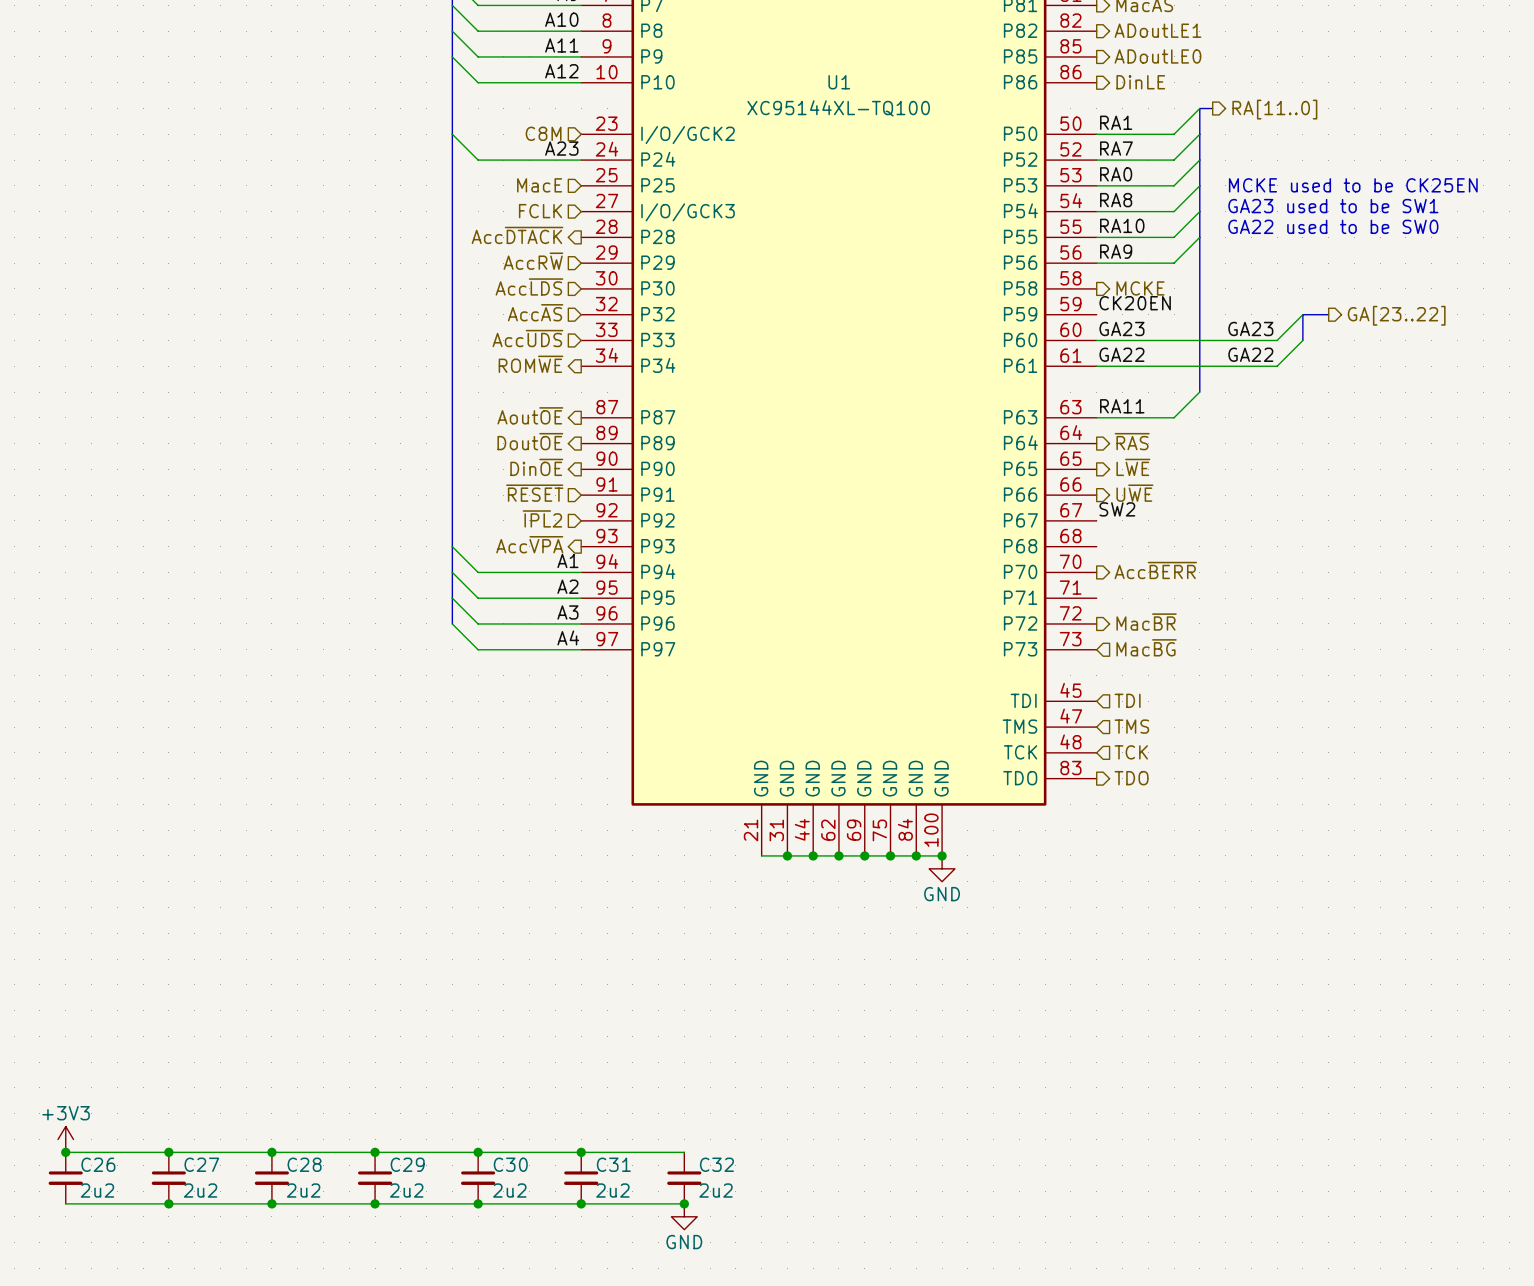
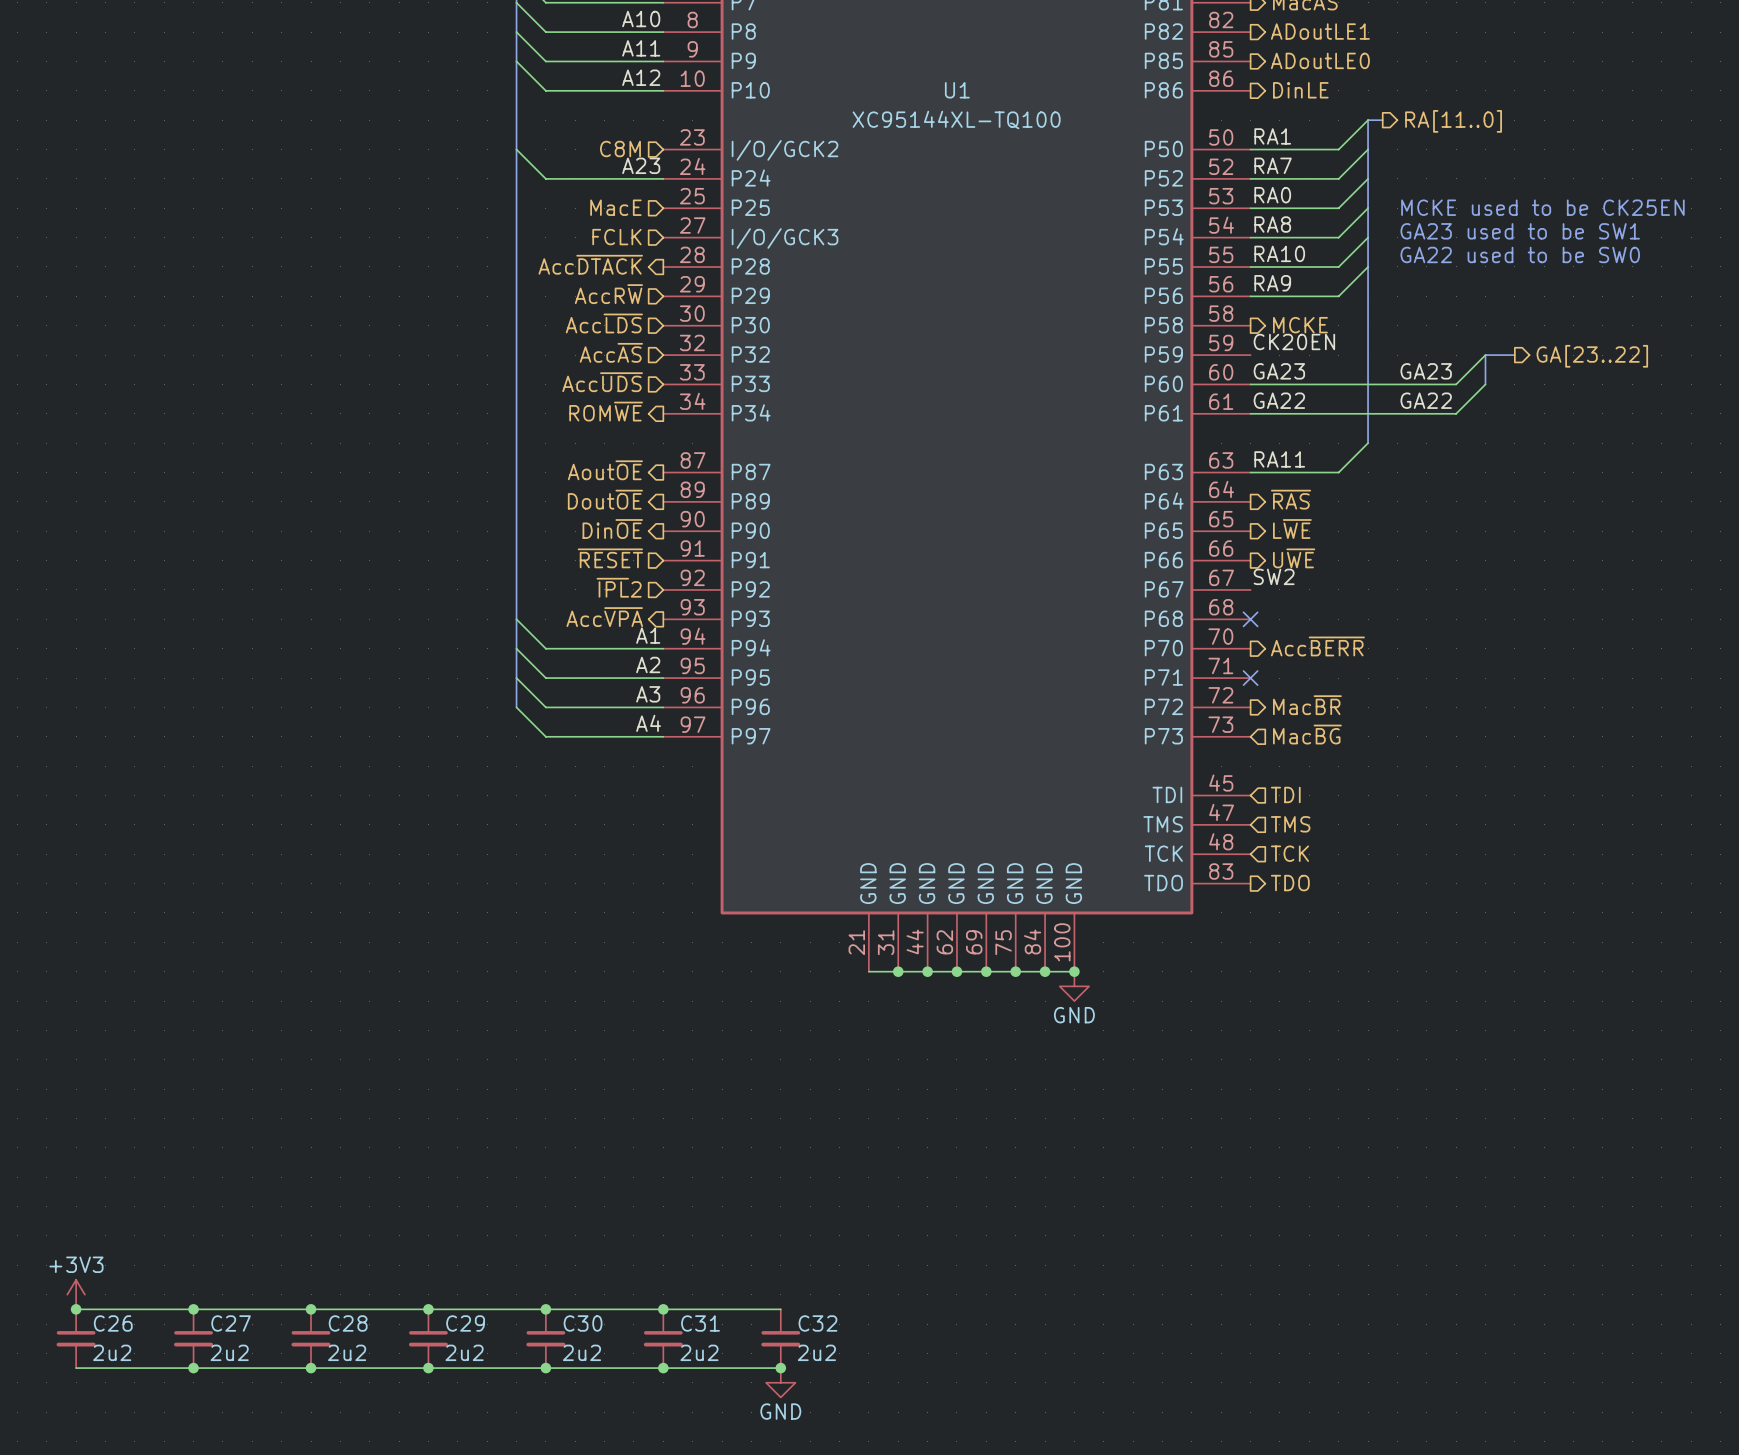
no-connect mark: none -> (1250, 619)
no-connect mark: none -> (1250, 678)

